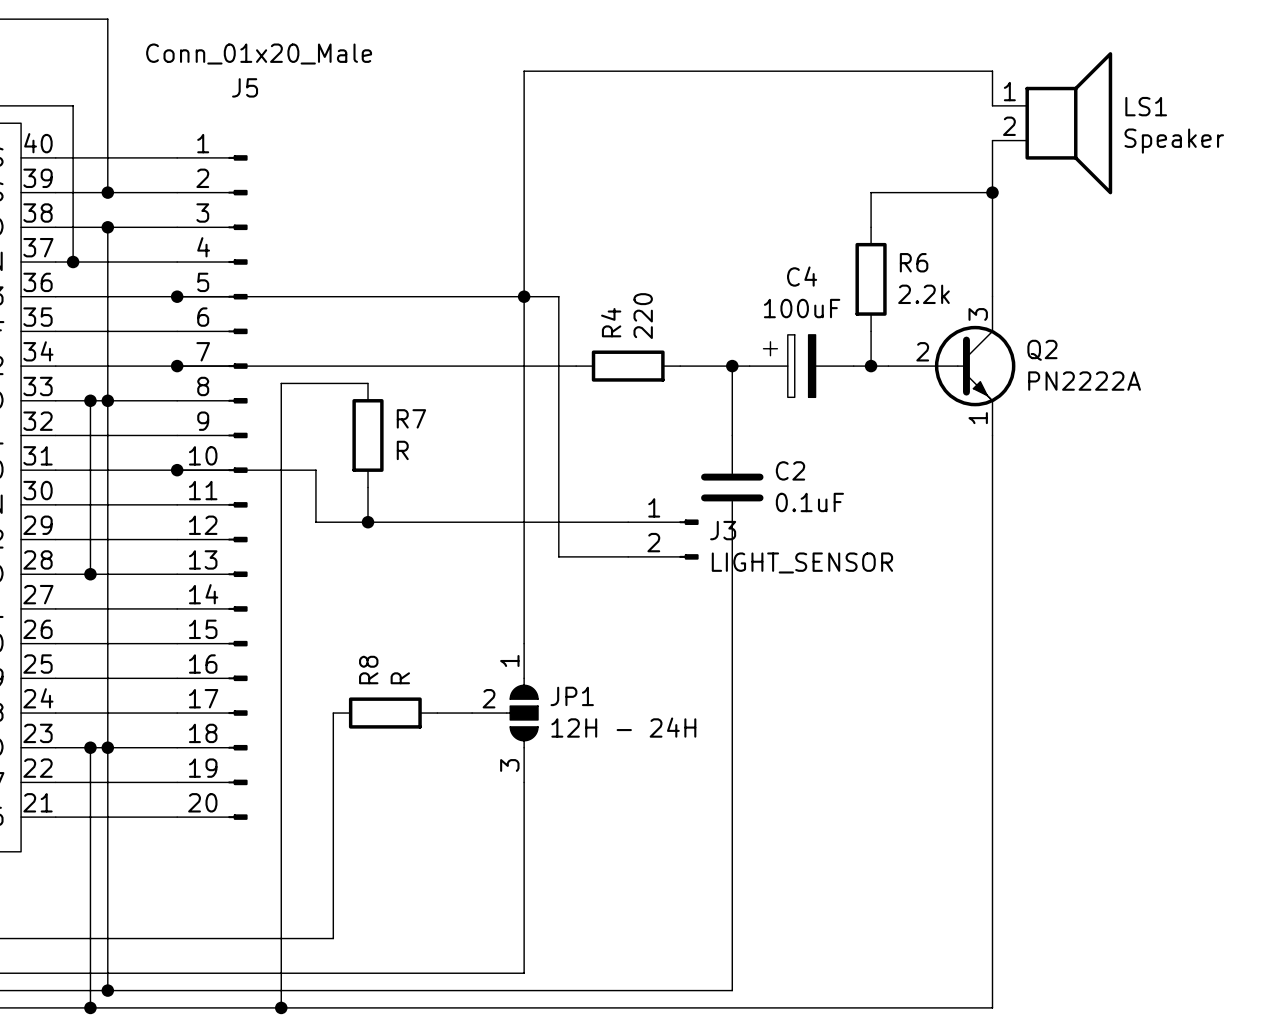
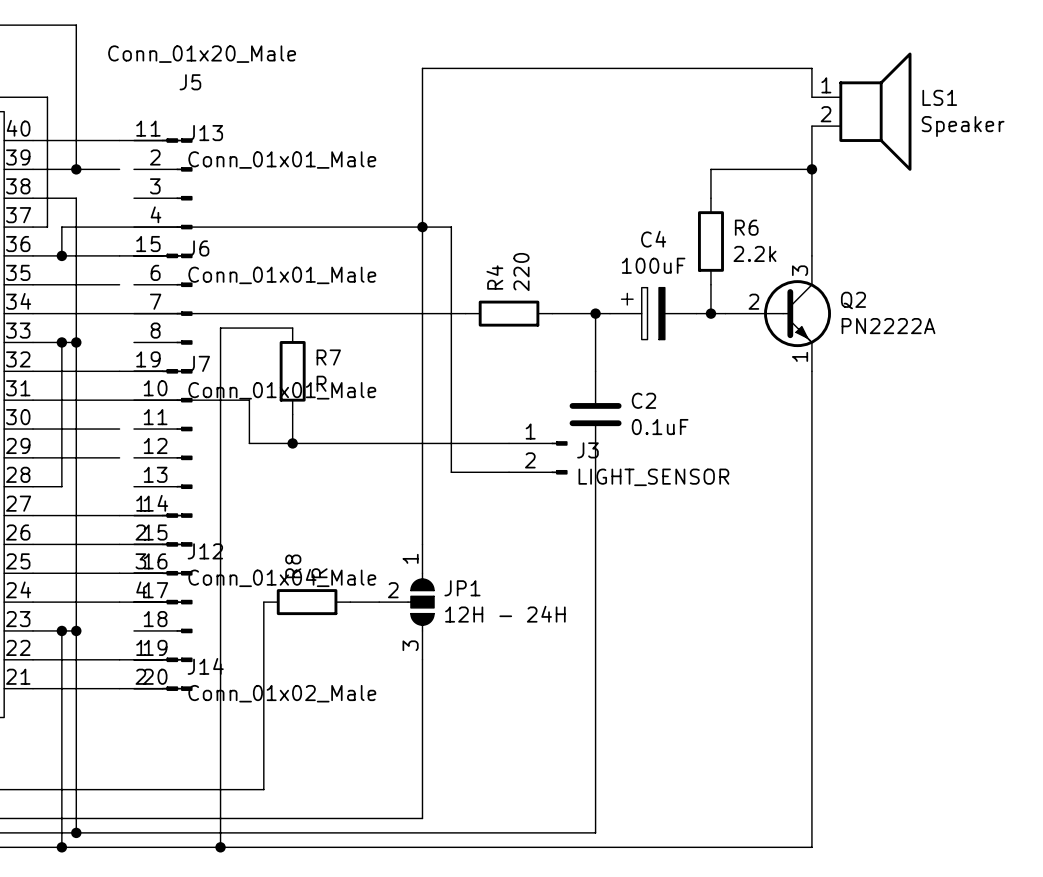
J13: none -> Conn_01x01_Male (148, 140)
wire: (159, 192) (177, 192) -> none
wire: (107, 227) (177, 227) -> none
junction: (107, 227) -> none
wire: (73, 262) (90, 262) -> (61, 255) (61, 227)
junction: (73, 262) -> none
junction: none -> (61, 255)
wire: (159, 296) (558, 296) -> (133, 227) (451, 227) (451, 255)
junction: (177, 296) -> none
J6: none -> Conn_01x01_Male (148, 255)
junction position: (524, 296) -> (422, 227)
wire: (159, 331) (177, 331) -> none
junction: (177, 366) -> none
wire: (107, 400) (177, 400) -> none
J7: none -> Conn_01x01_Male (148, 371)
junction: (177, 470) -> none
wire: (159, 504) (177, 504) -> none
wire: (159, 539) (177, 539) -> none
wire: (90, 574) (177, 574) -> none
junction: (90, 574) -> none
J12: none -> Conn_01x04_Male (148, 558)
wire: (107, 747) (177, 747) -> none
J14: none -> Conn_01x02_Male (148, 674)

